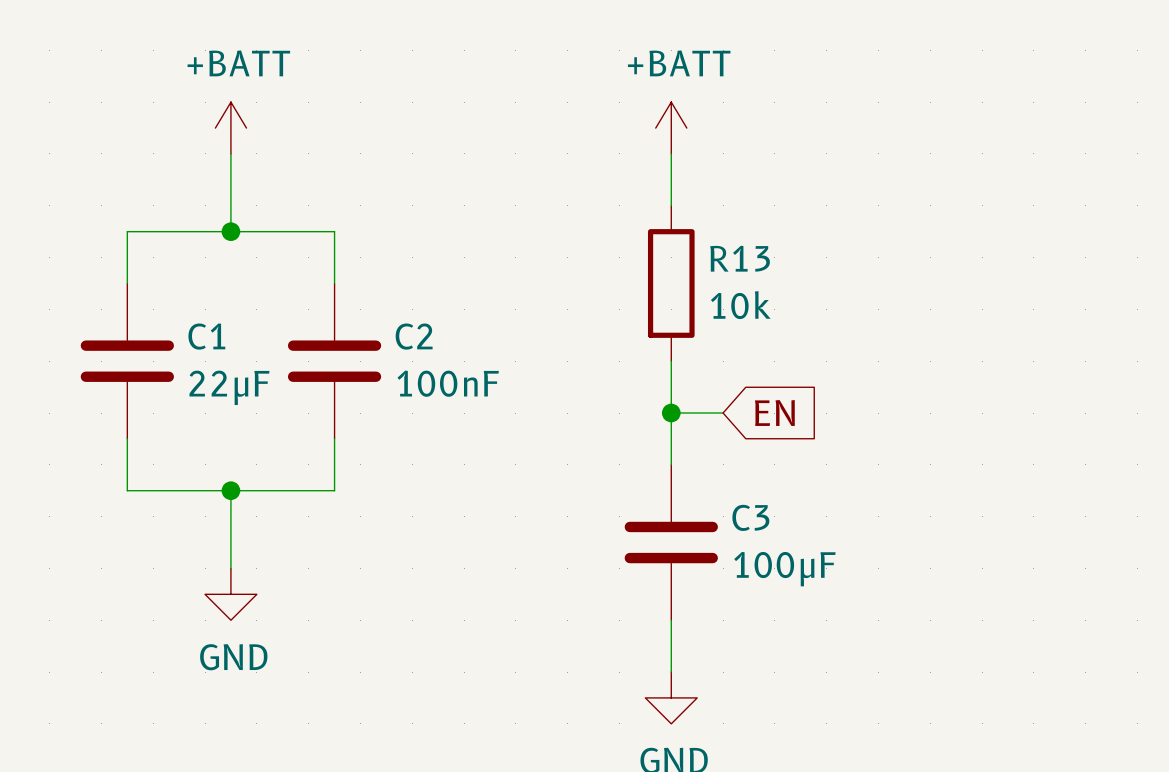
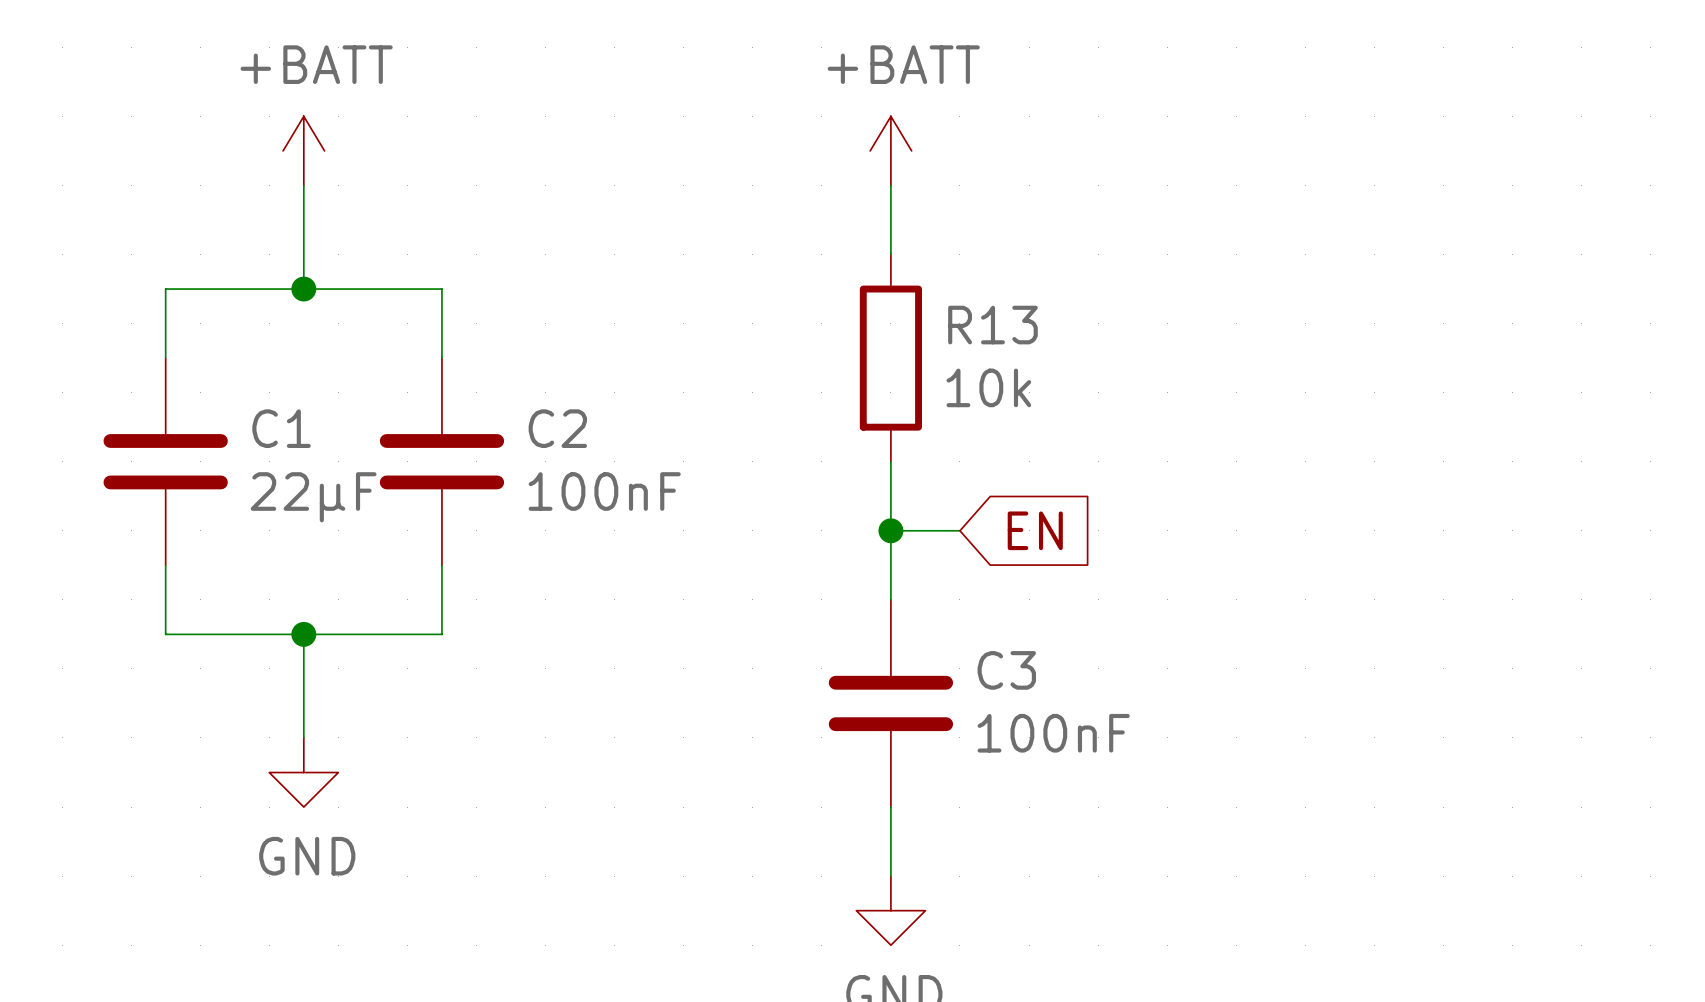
C3 value: 100μF (784, 569) -> 100nF (1053, 733)

